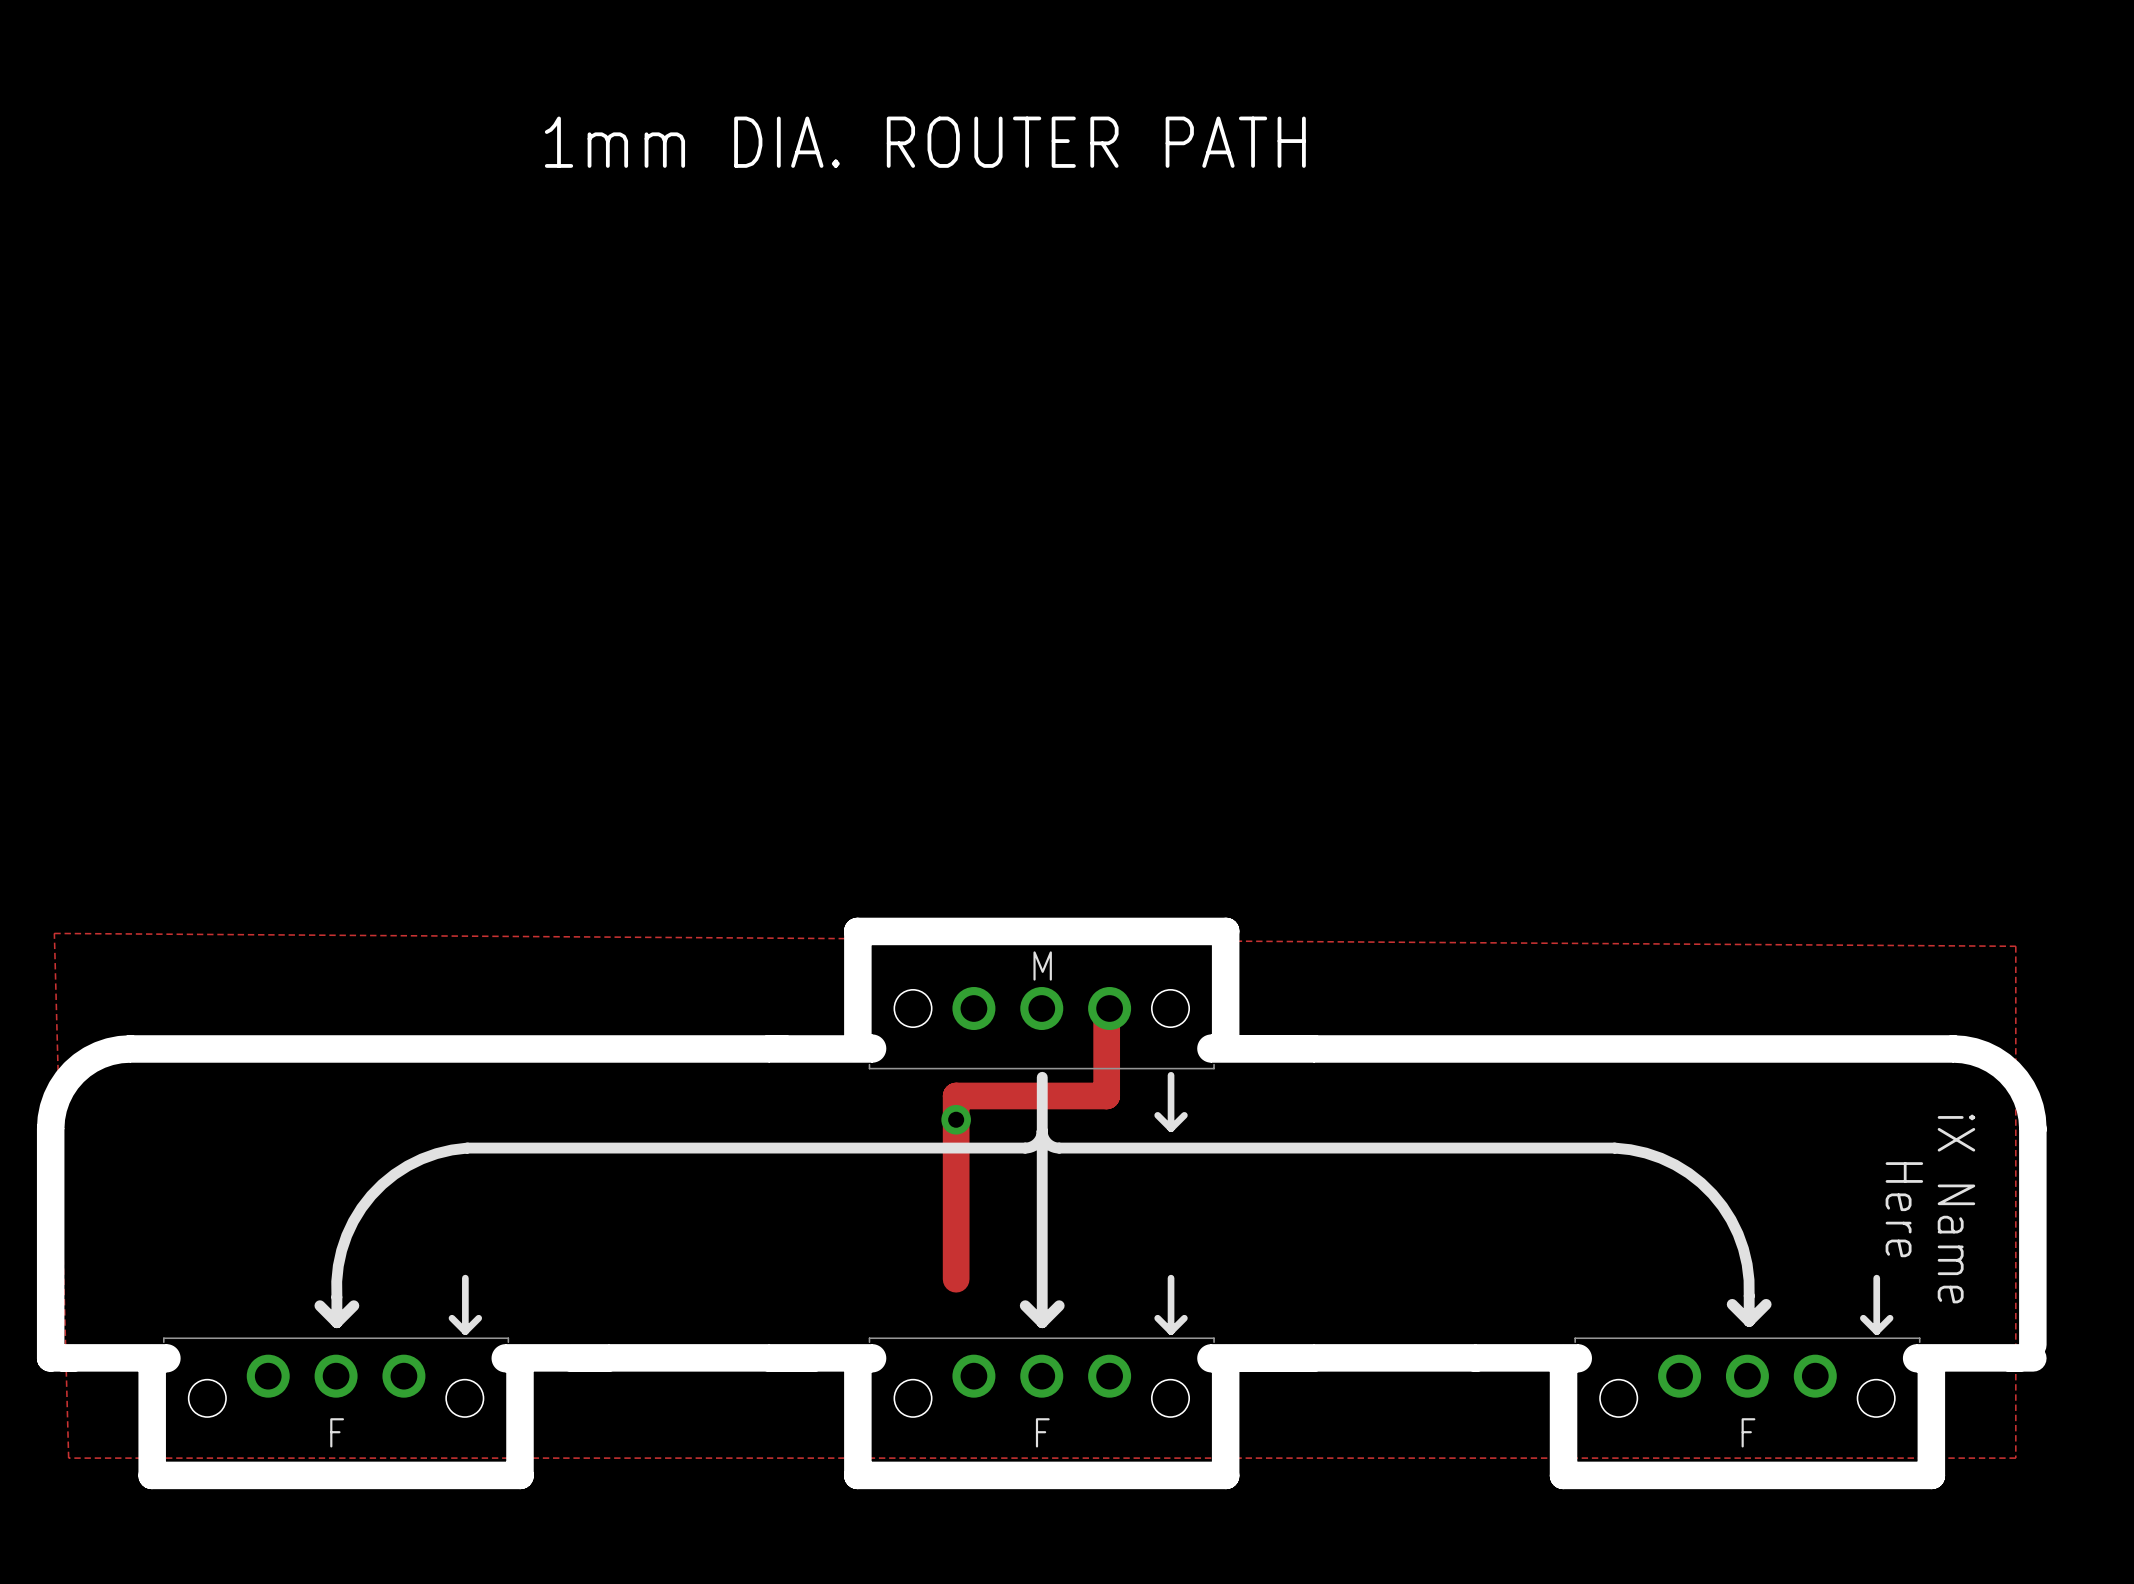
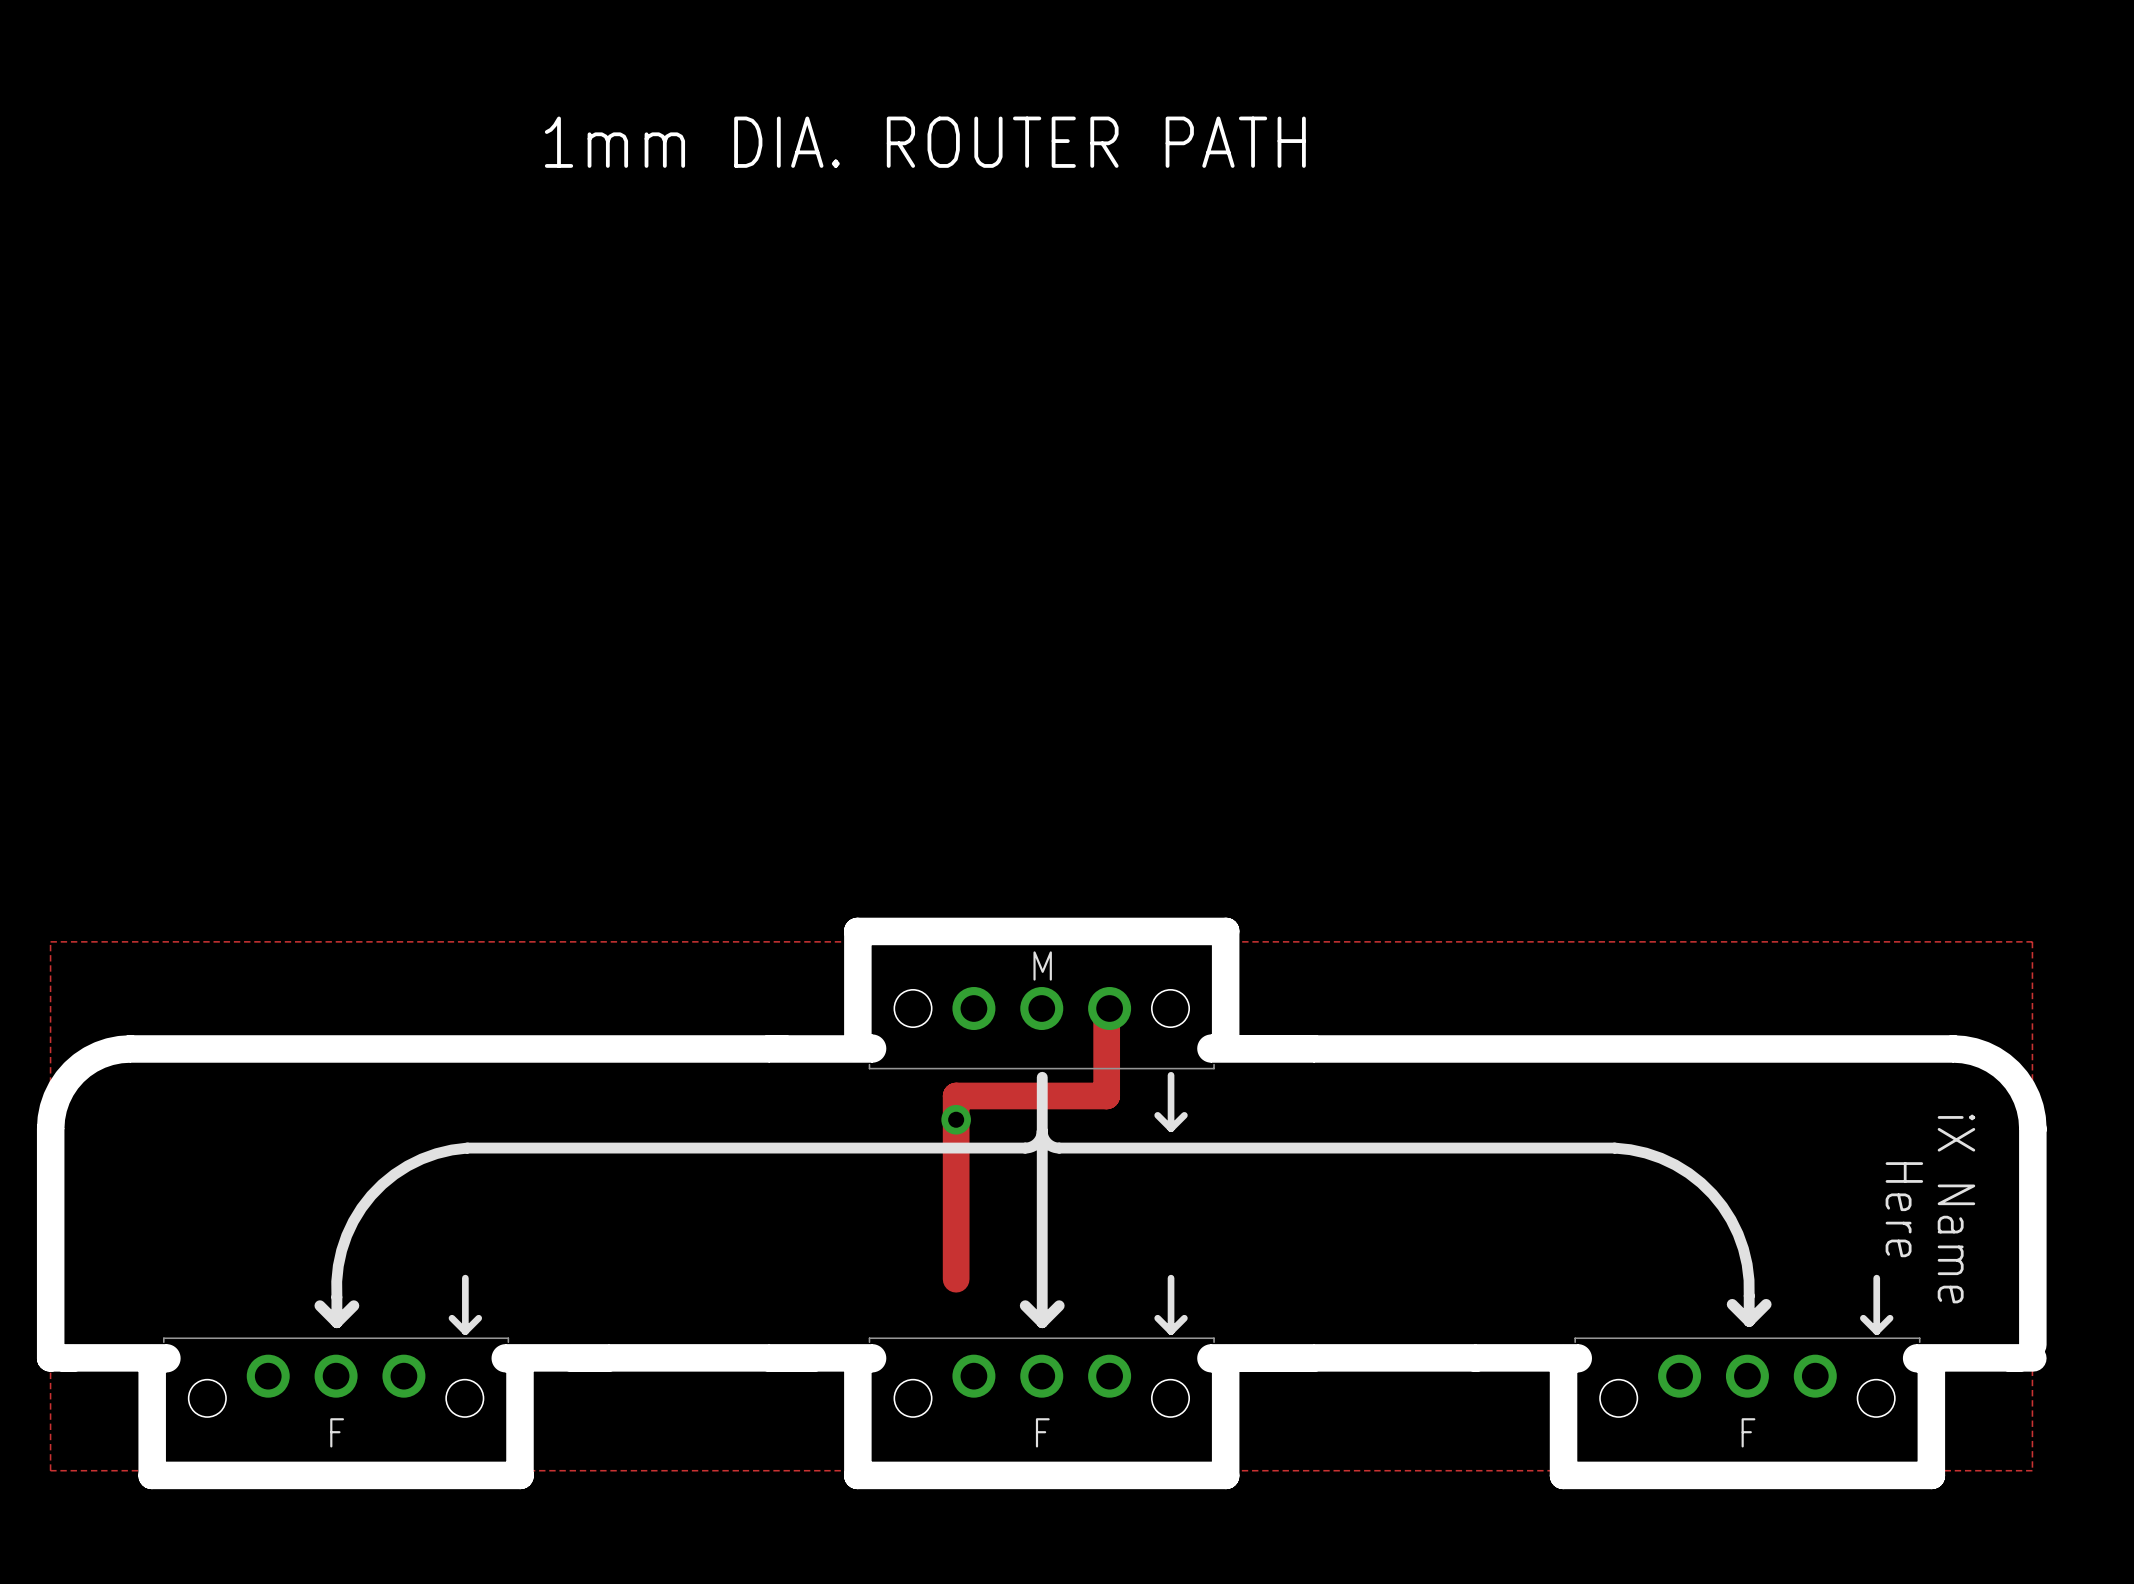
zone outline: (54, 933) (2015, 946) (2015, 1458) (68, 1458) (54, 933) -> (50, 941) (50, 1470) (2032, 1470) (2032, 941) (50, 941)

